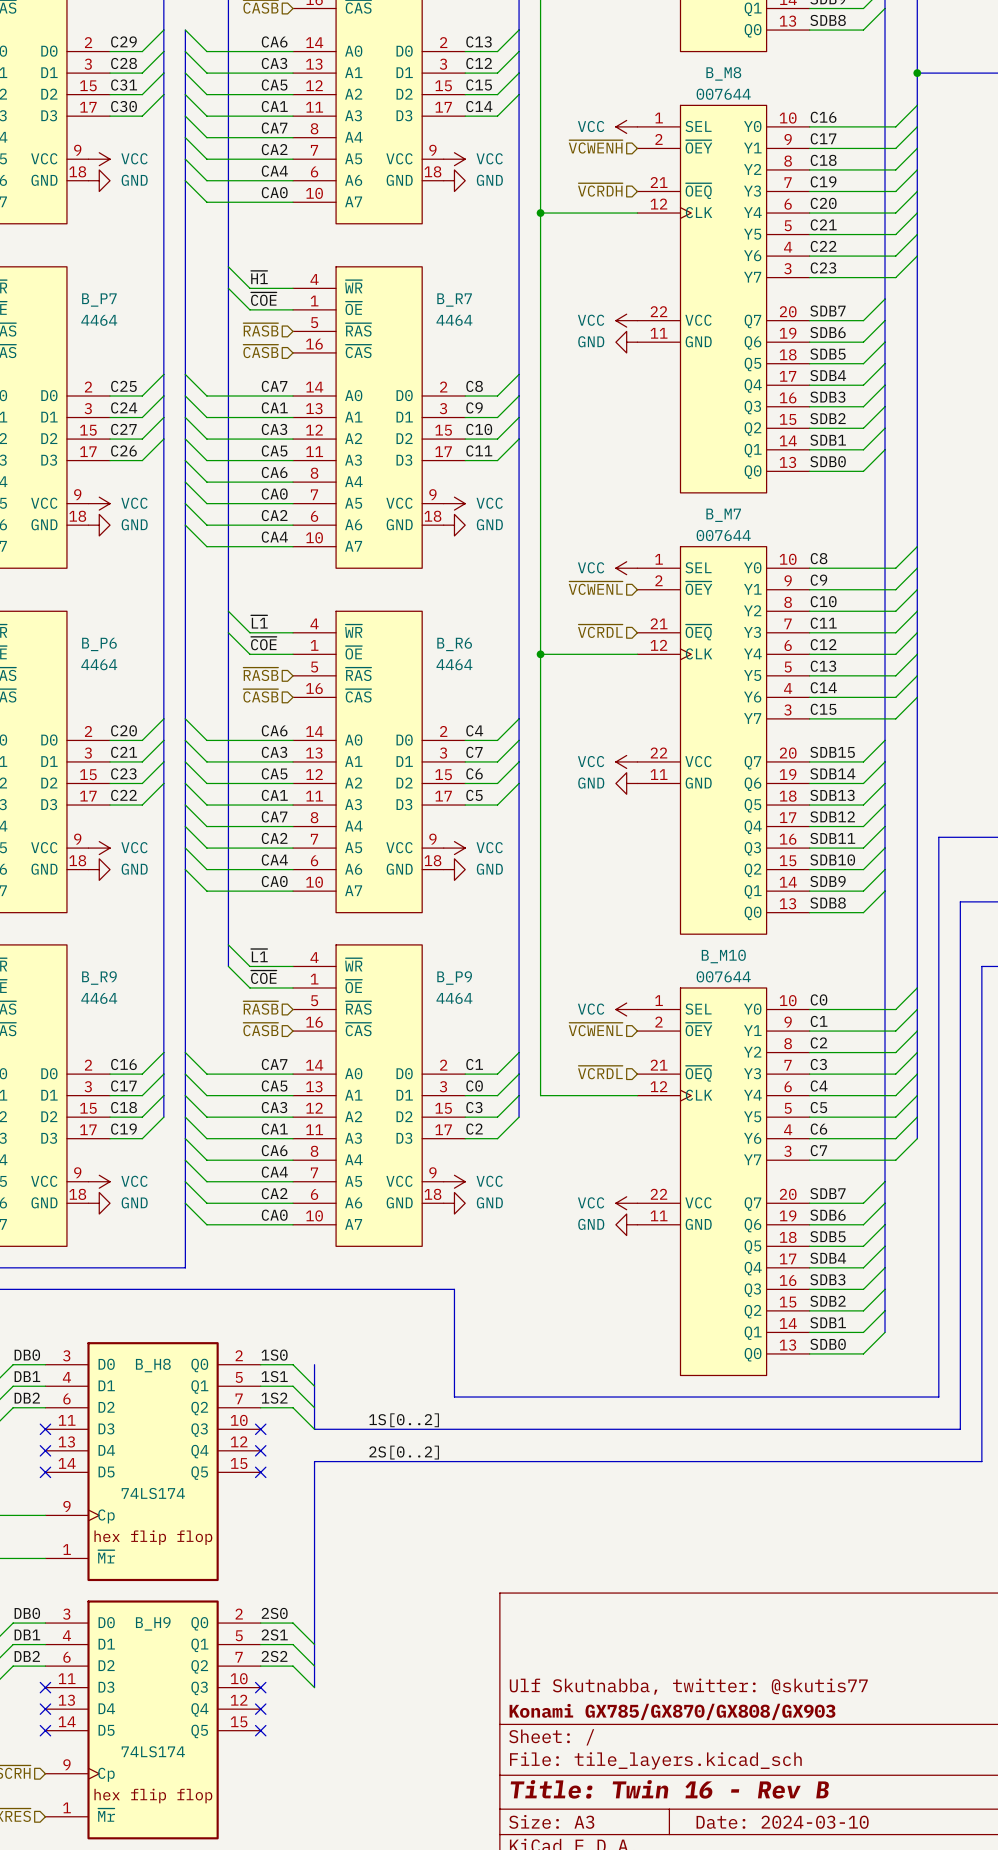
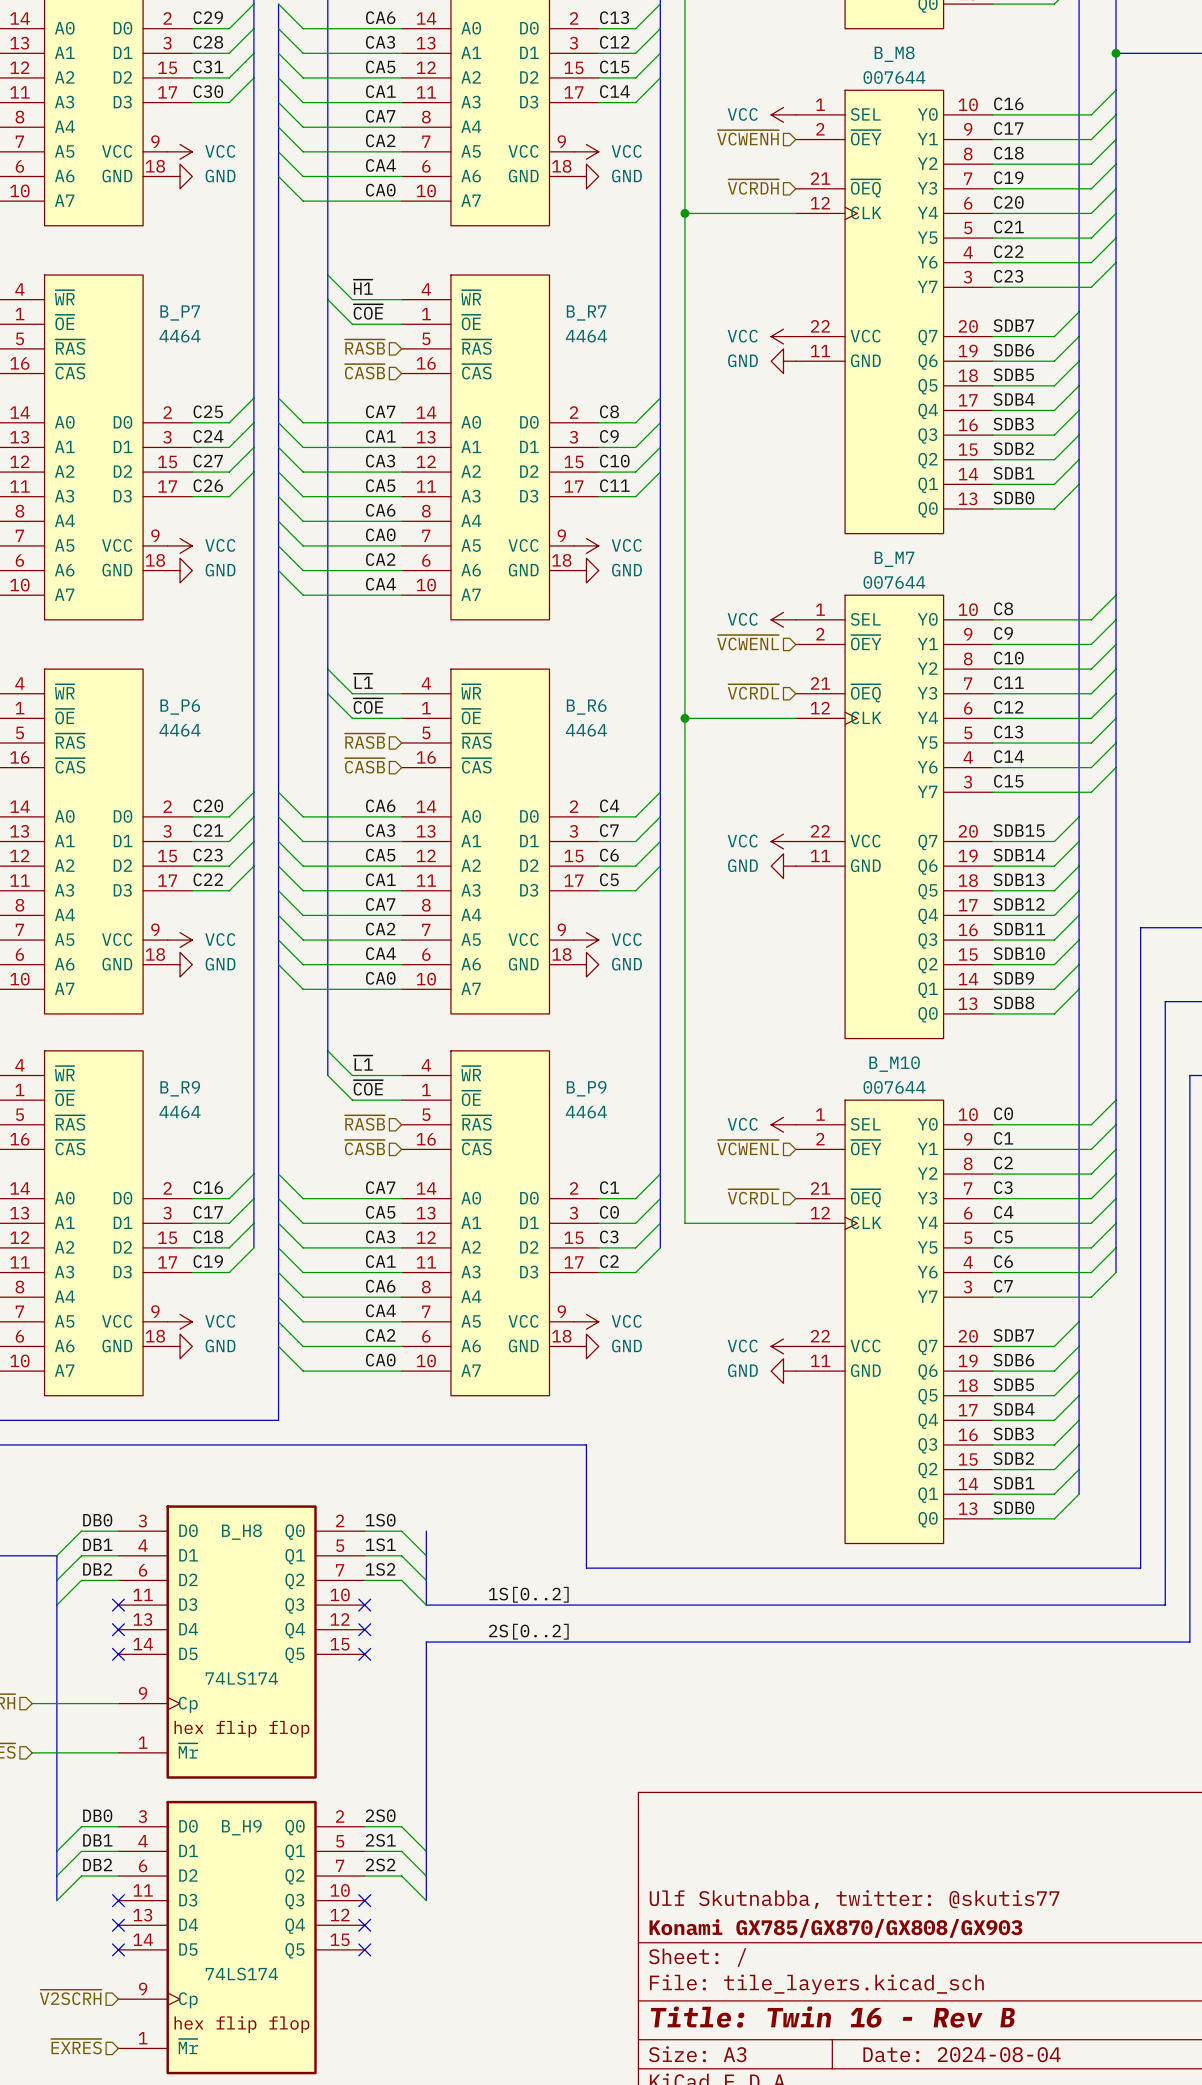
title block: Date: 2024-03-10 (782, 1822) -> Date: 2024-08-04 (962, 2054)

